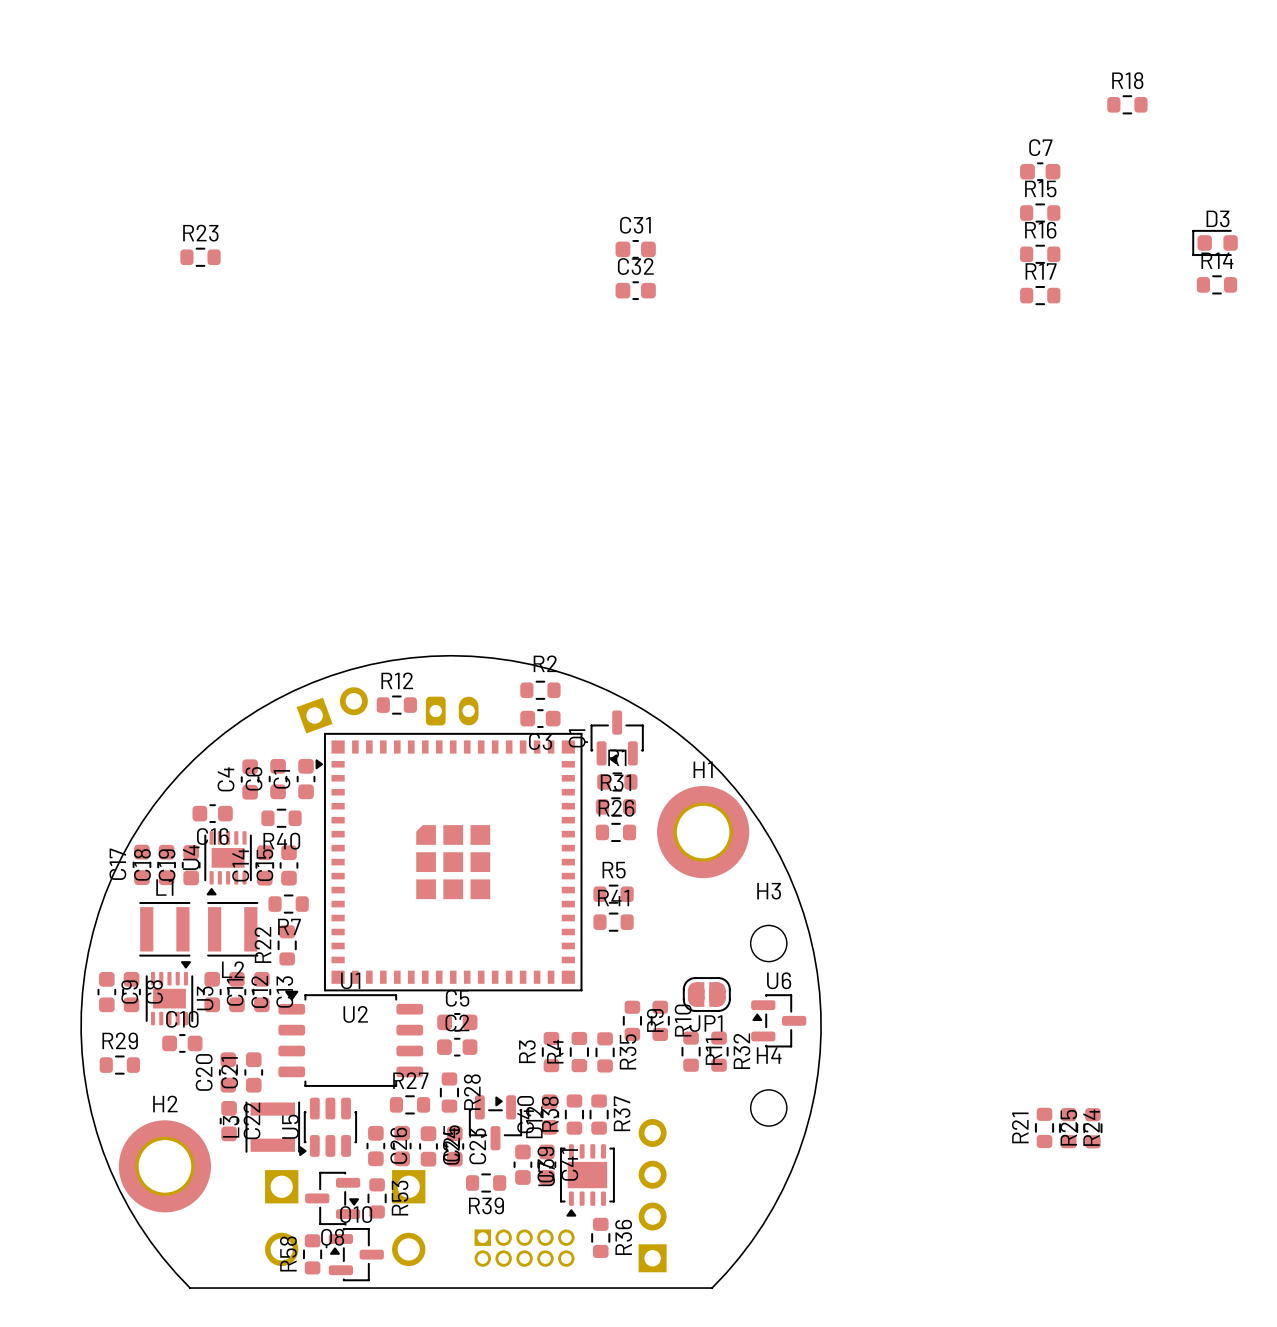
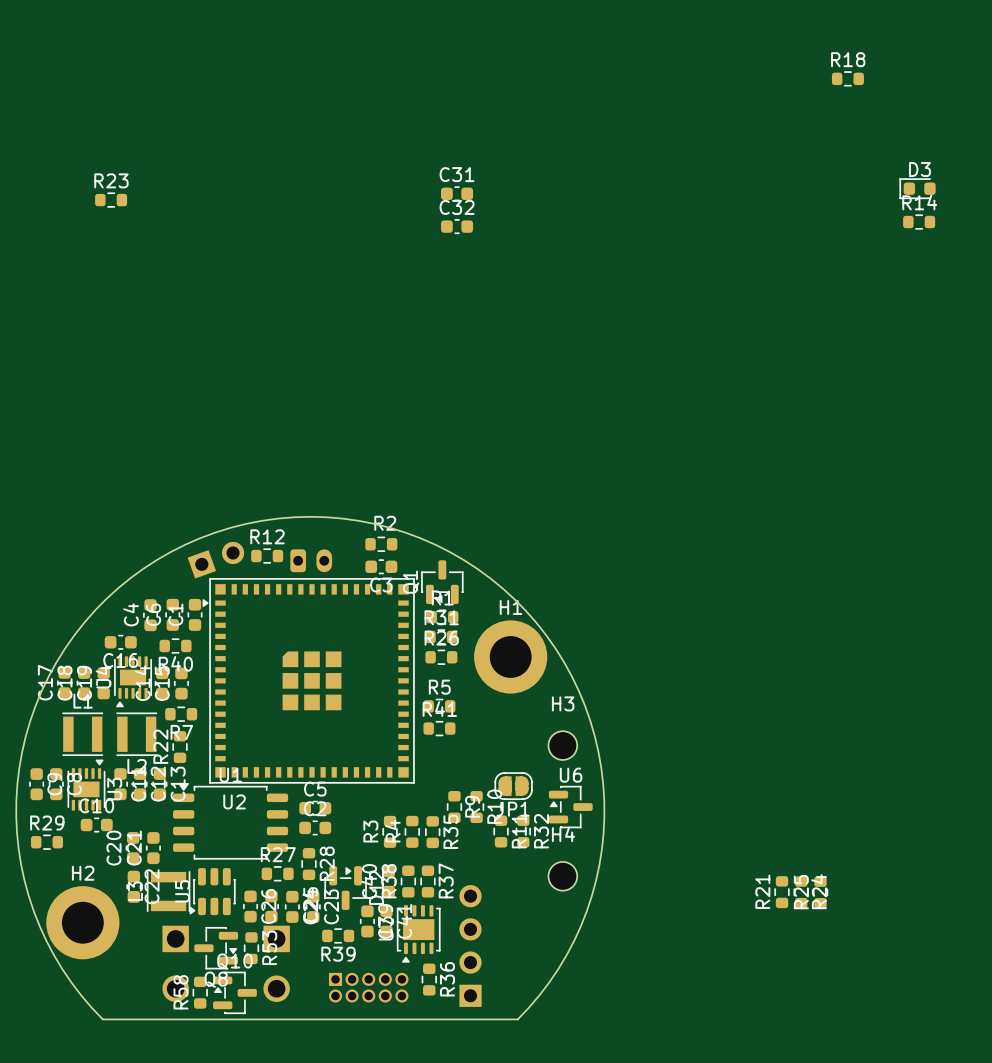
C7: (1040, 171) -> none
R15: (1040, 213) -> none
R16: (1040, 254) -> none
R17: (1040, 295) -> none

